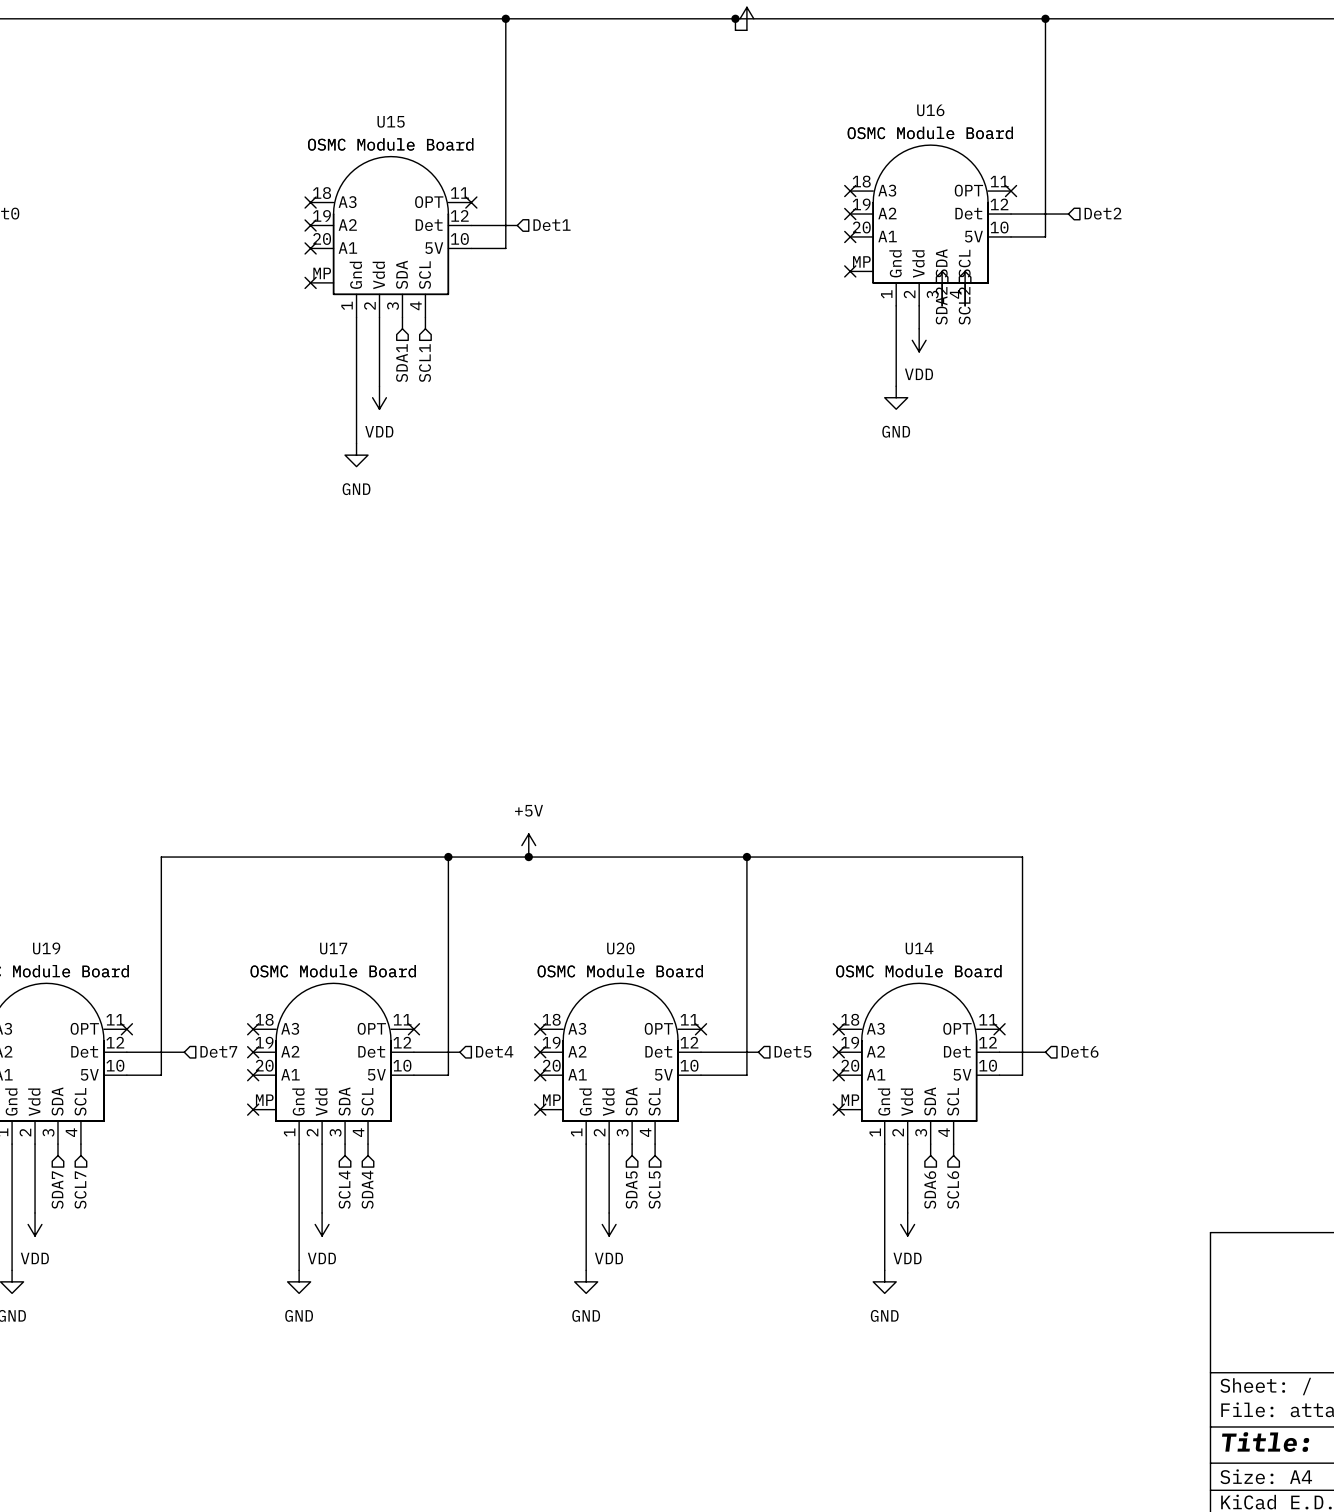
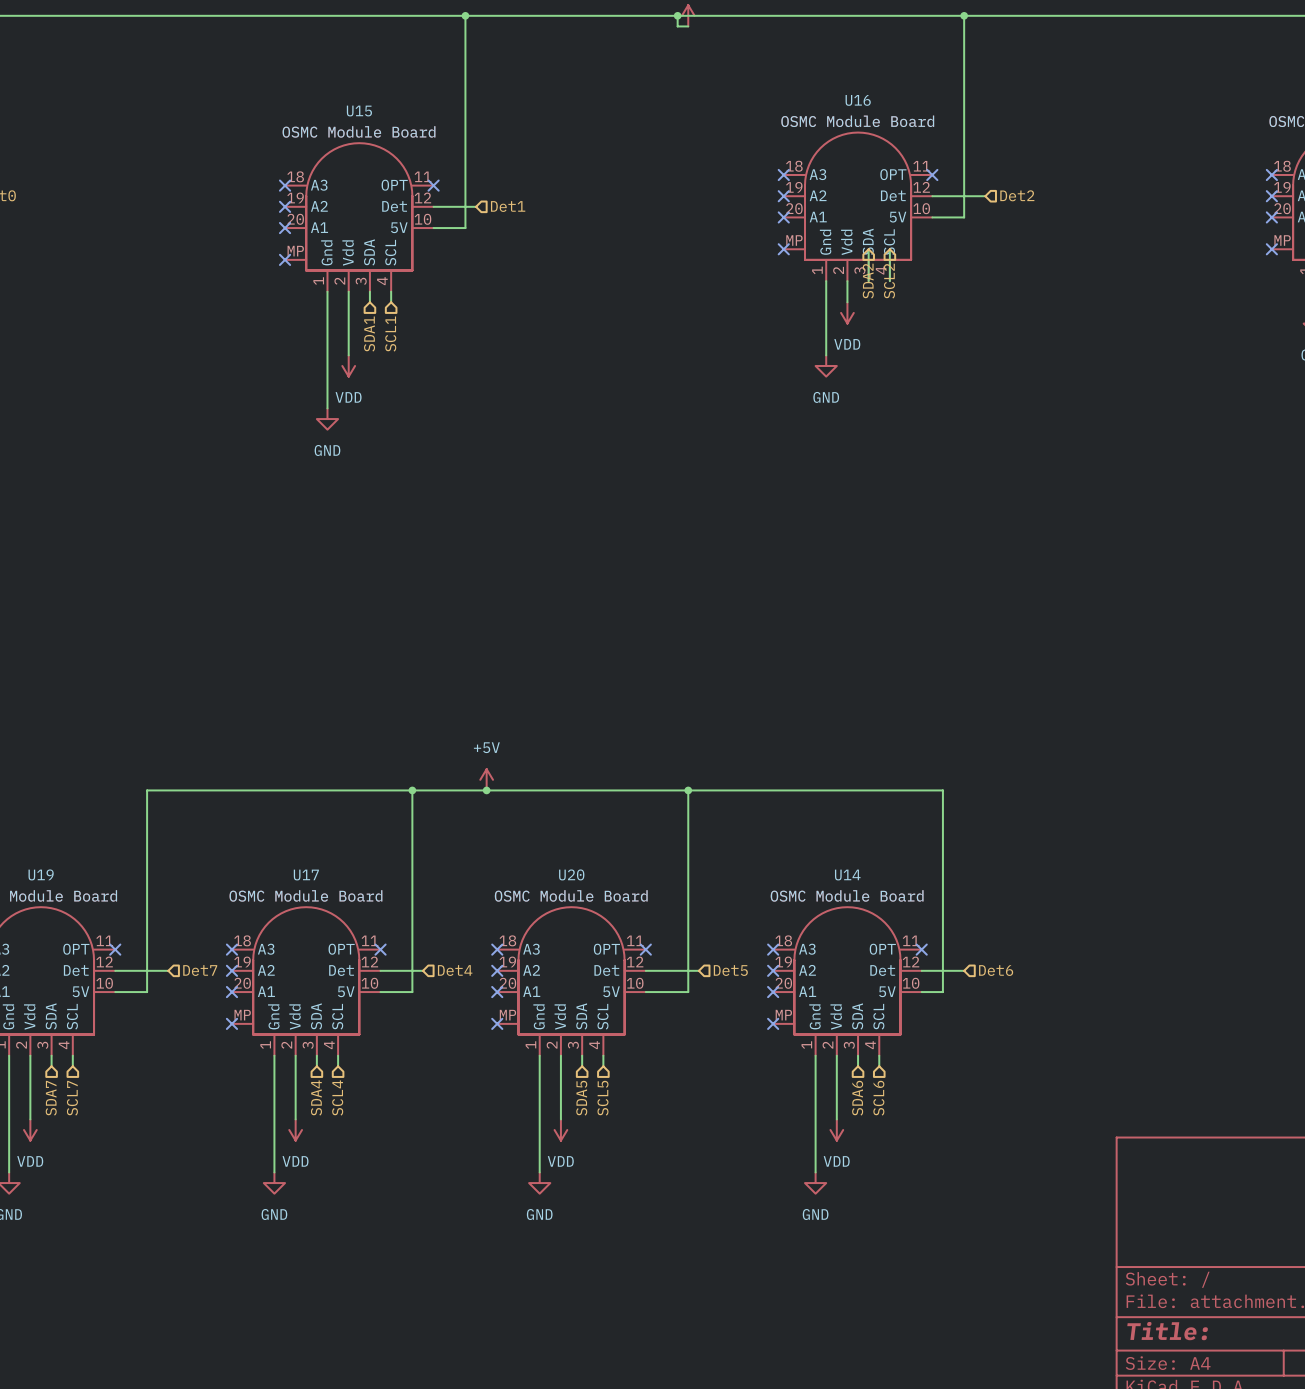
hierarchical label: SCL4 (344, 1189) -> SDA4 (316, 1098)
hierarchical label: SDA4 (367, 1189) -> SCL4 (337, 1098)

